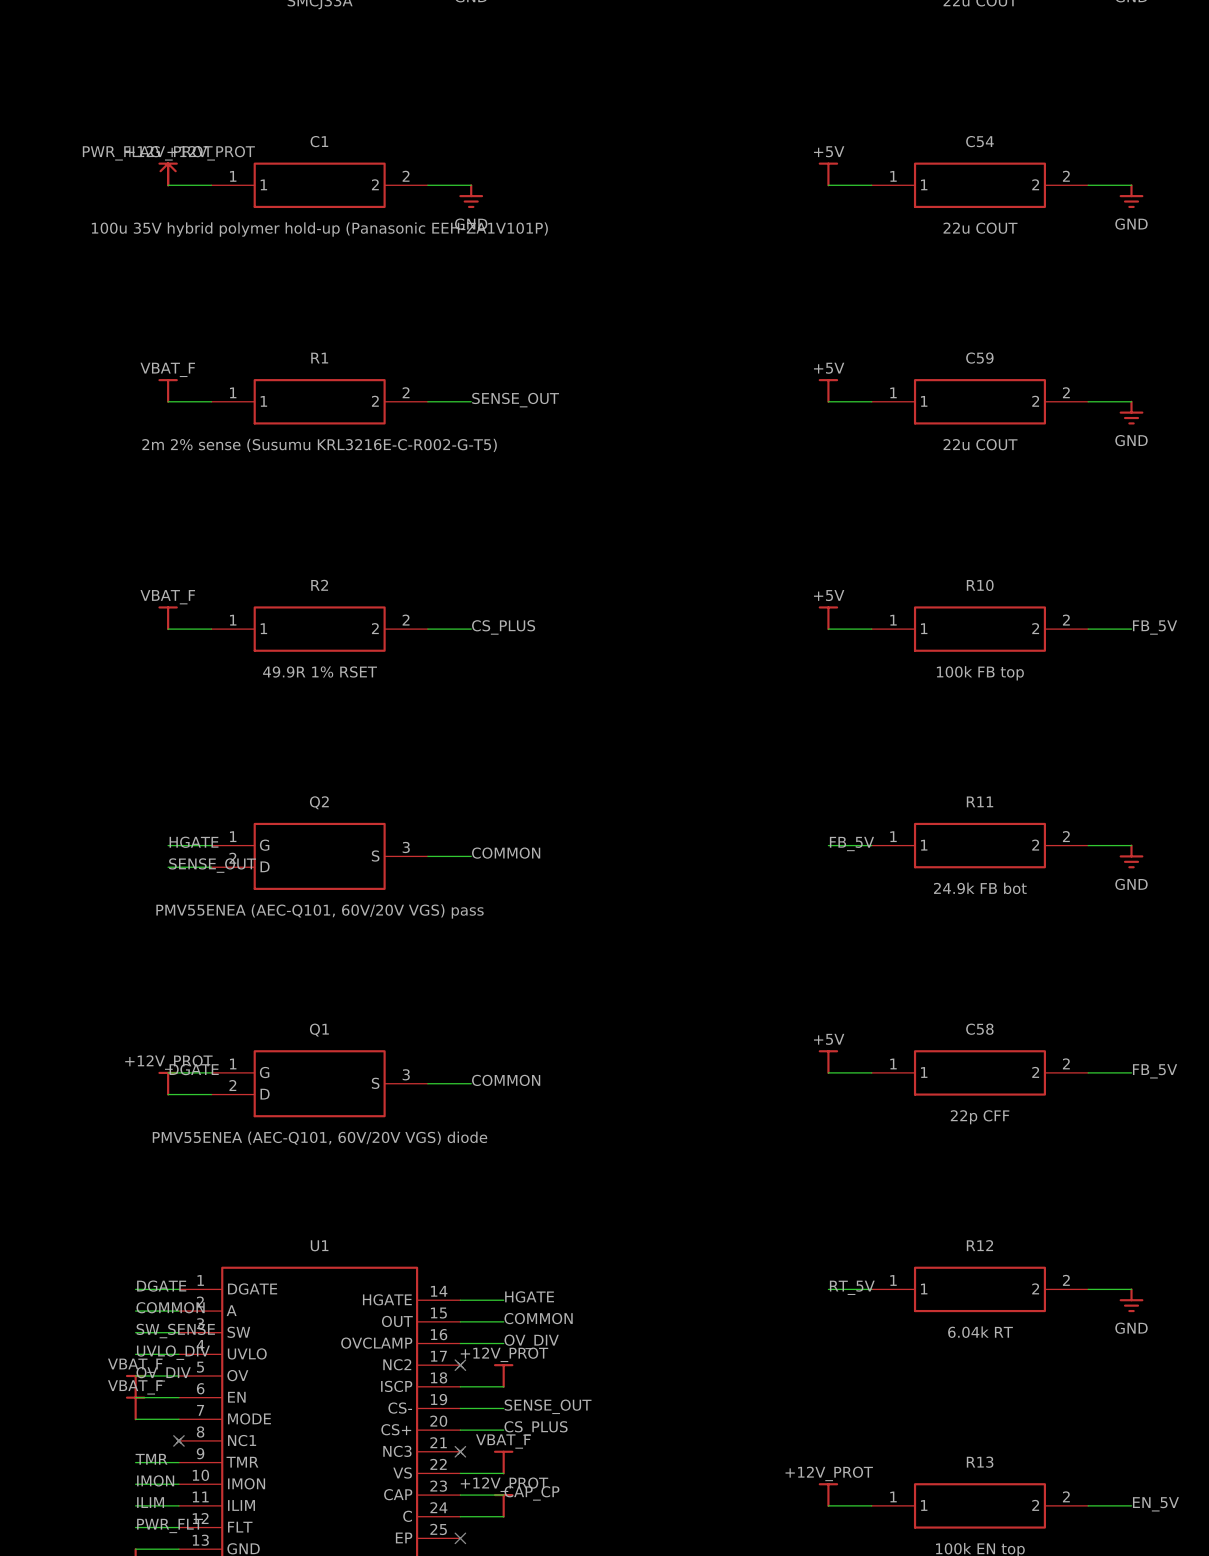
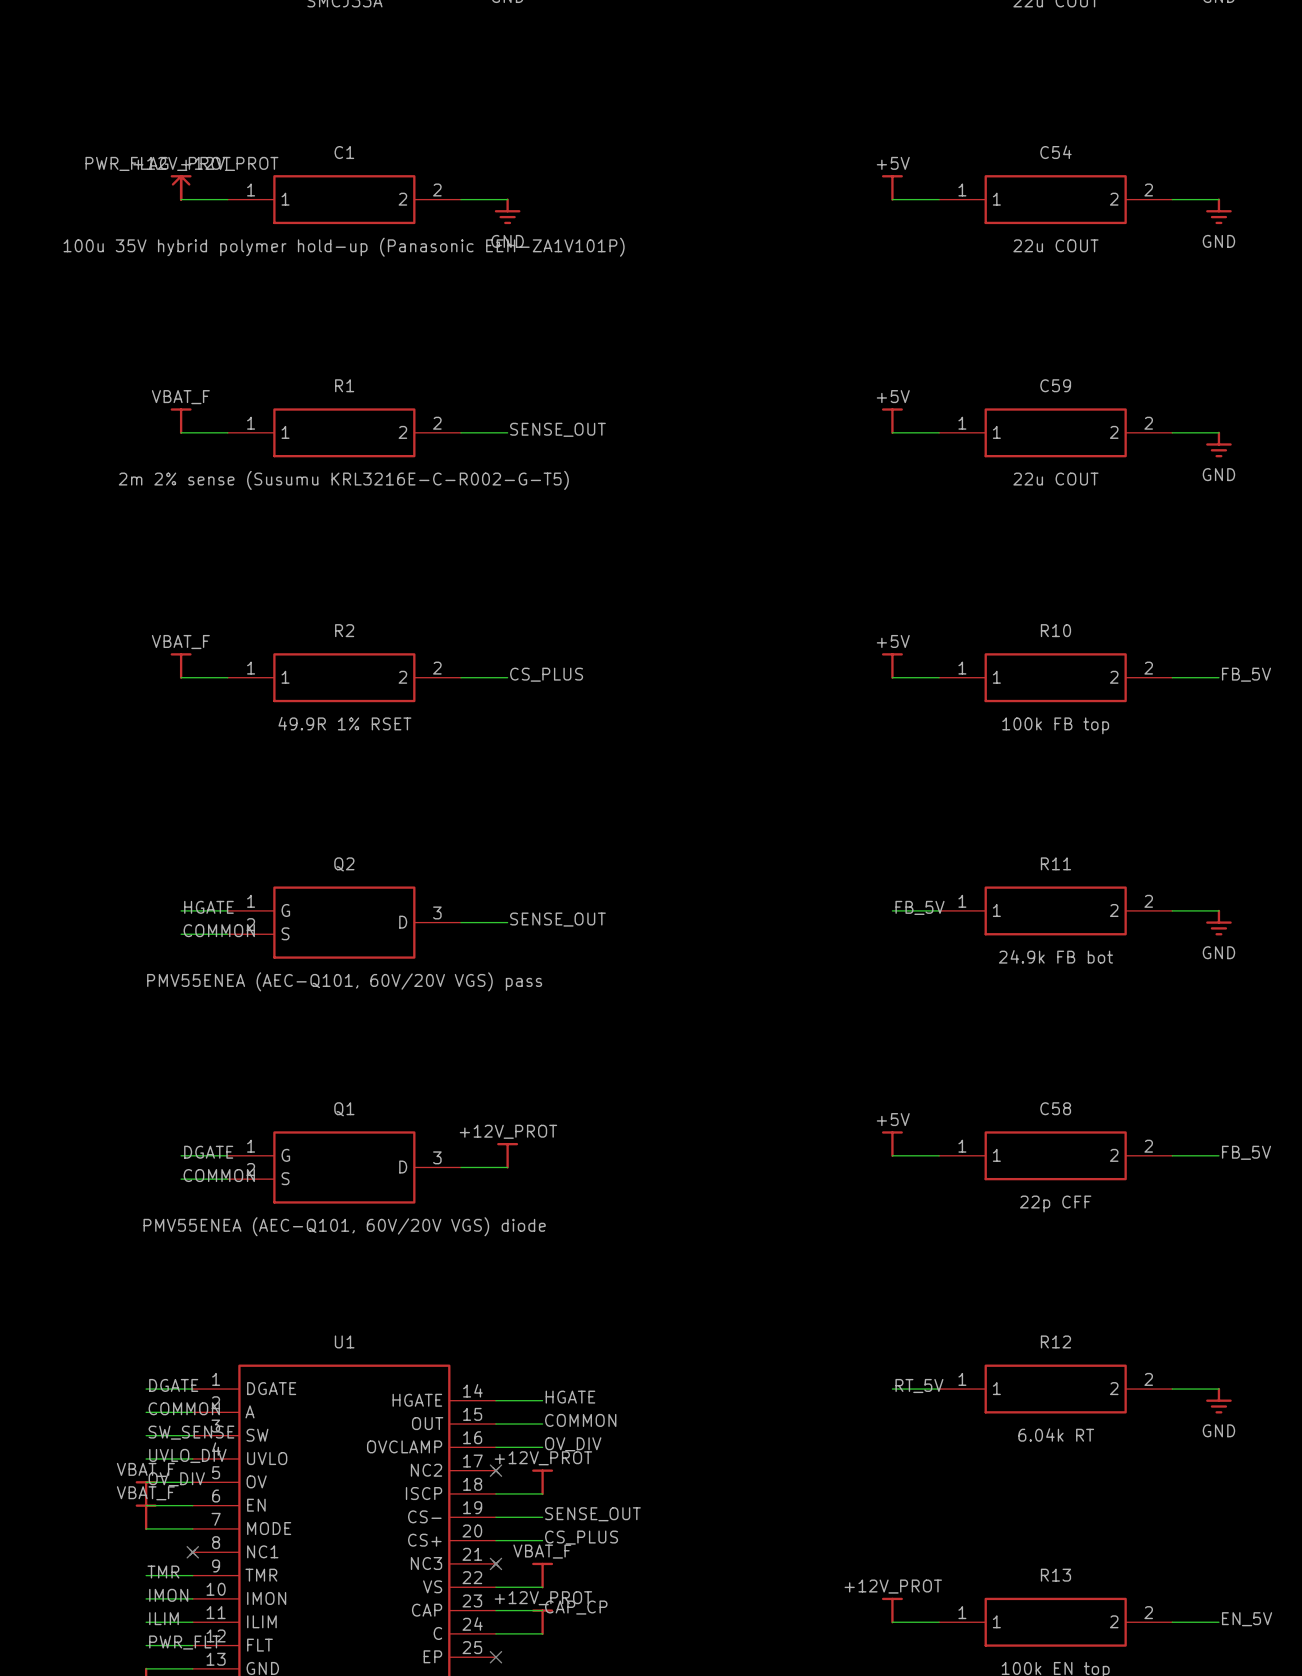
label: COMMON (506, 853) -> SENSE_OUT (557, 919)
Q2 pin name: S (375, 856) -> D (403, 922)
label: SENSE_OUT (212, 865) -> COMMON (219, 930)
Q2 pin name: D (265, 866) -> S (285, 933)
power symbol: none -> +12V_PROT (507, 1155)
label: COMMON (506, 1080) -> none
power symbol: +12V_PROT (168, 1083) -> none
Q1 pin name: S (375, 1083) -> D (403, 1167)
label: none -> COMMON (219, 1175)
Q1 pin name: D (265, 1094) -> S (285, 1178)

